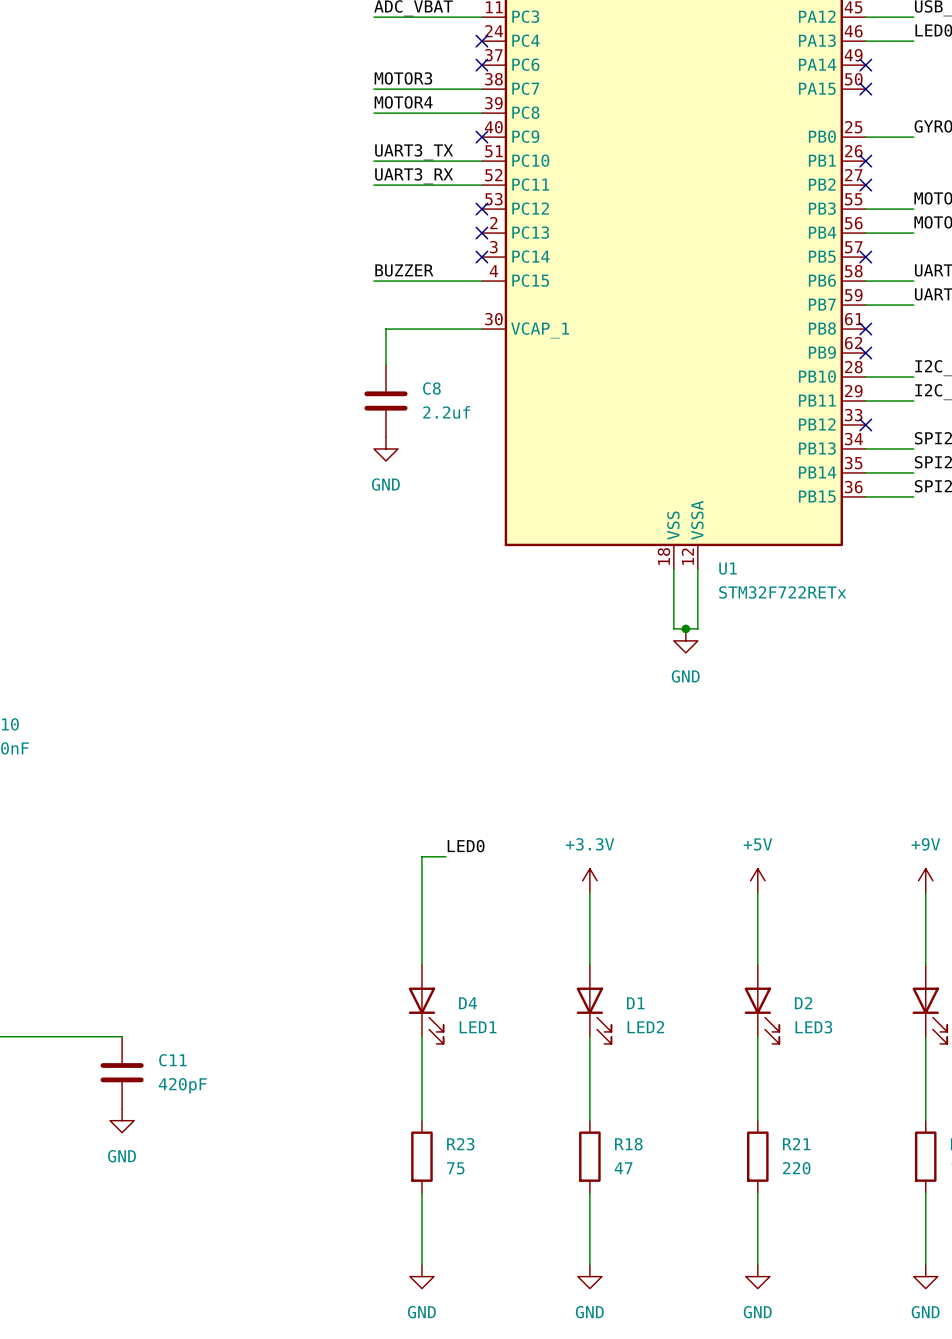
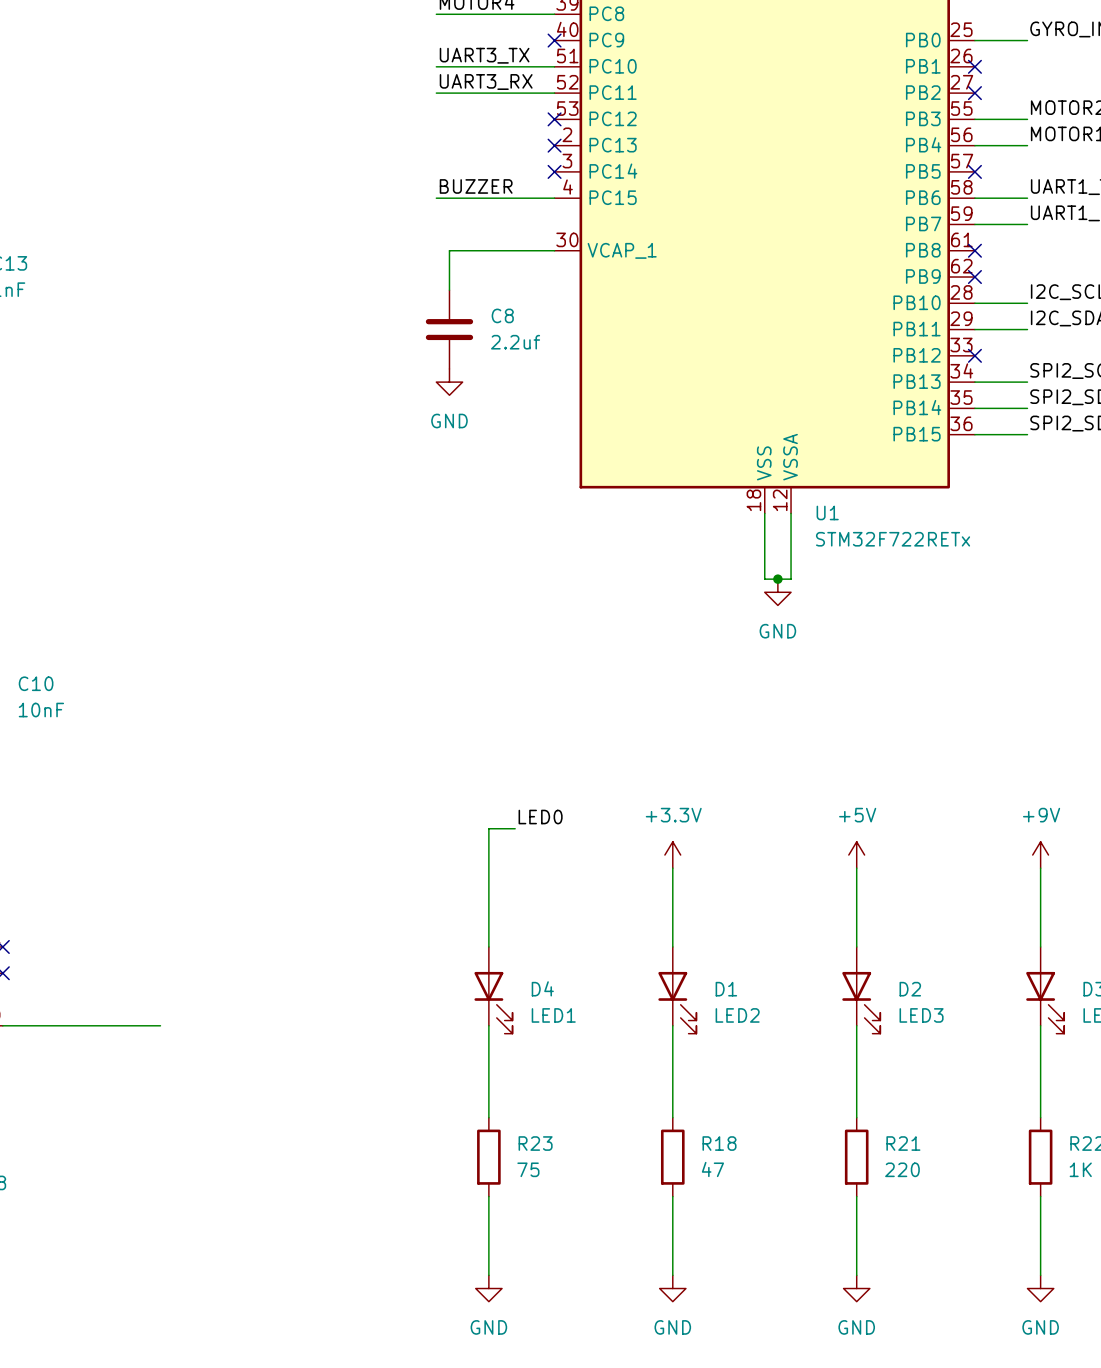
C11: 420pF (122, 1072) -> none
power symbol: GND (122, 1120) -> none

